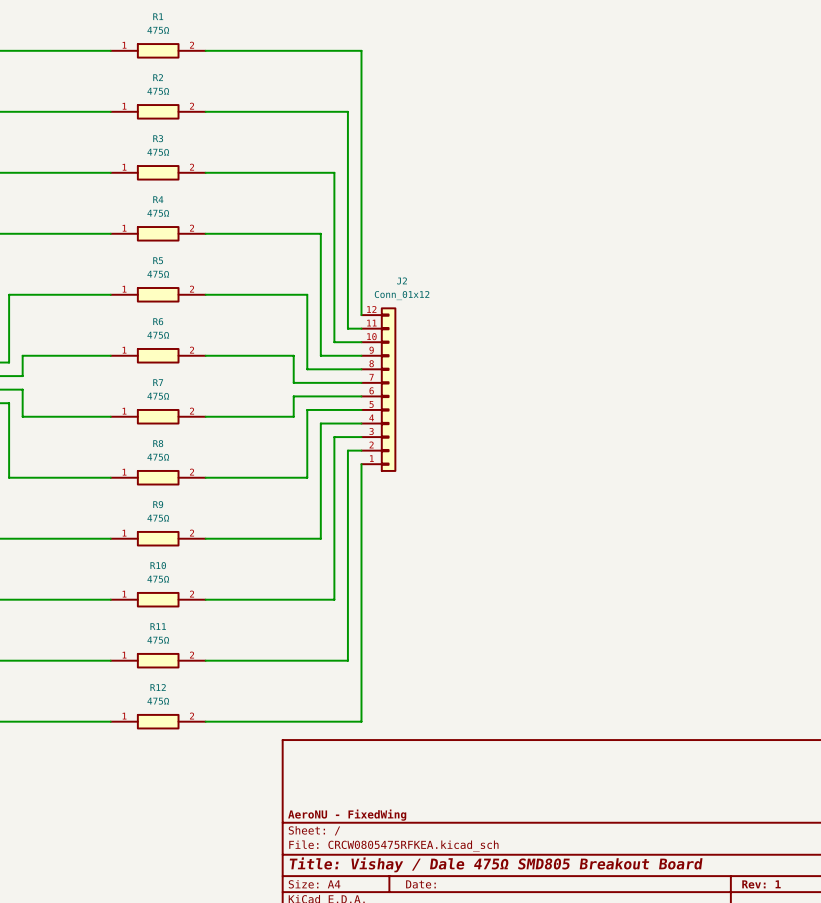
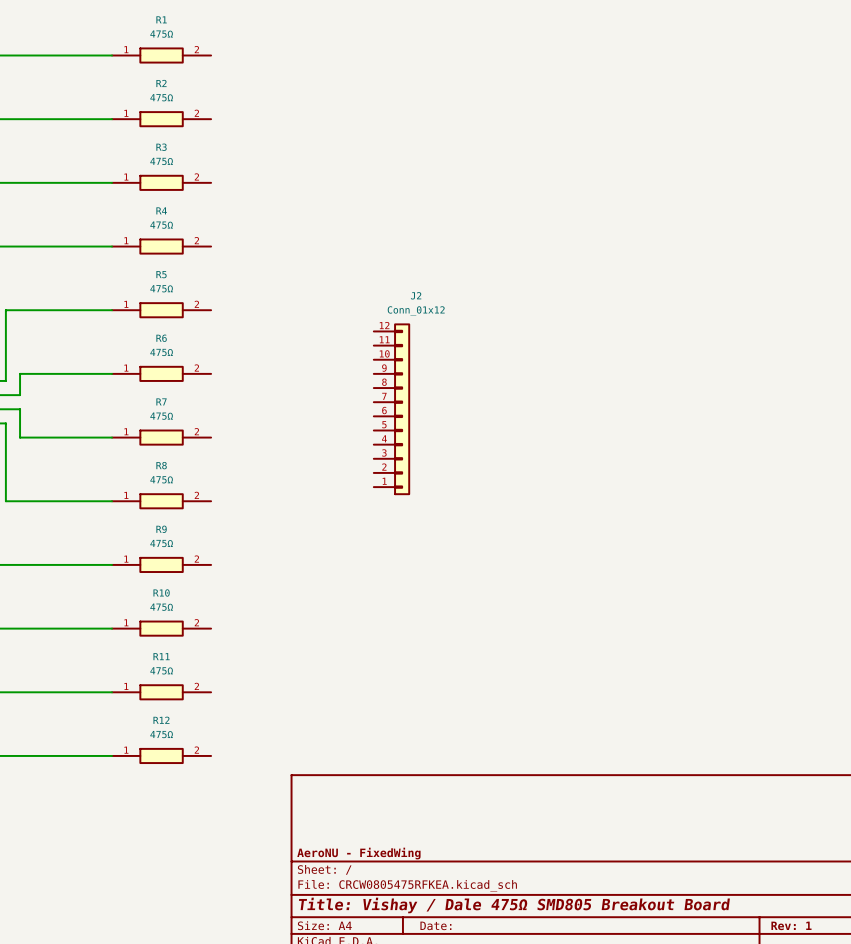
wire: (205, 50) (361, 50) (361, 315) -> none
wire: (205, 111) (347, 111) (347, 328) (361, 328) -> none
wire: (205, 172) (334, 172) (334, 342) (361, 342) -> none
wire: (205, 233) (320, 233) (320, 355) (361, 355) -> none
wire: (205, 294) (307, 294) (307, 369) (361, 369) -> none
wire: (205, 355) (293, 355) (293, 382) (361, 382) -> none
wire: (361, 396) (293, 396) (293, 416) (205, 416) -> none
wire: (361, 409) (307, 409) (307, 477) (205, 477) -> none
wire: (361, 423) (320, 423) (320, 538) (205, 538) -> none
wire: (361, 437) (334, 437) (334, 599) (205, 599) -> none
wire: (361, 450) (347, 450) (347, 660) (205, 660) -> none
wire: (361, 464) (361, 721) (205, 721) -> none

